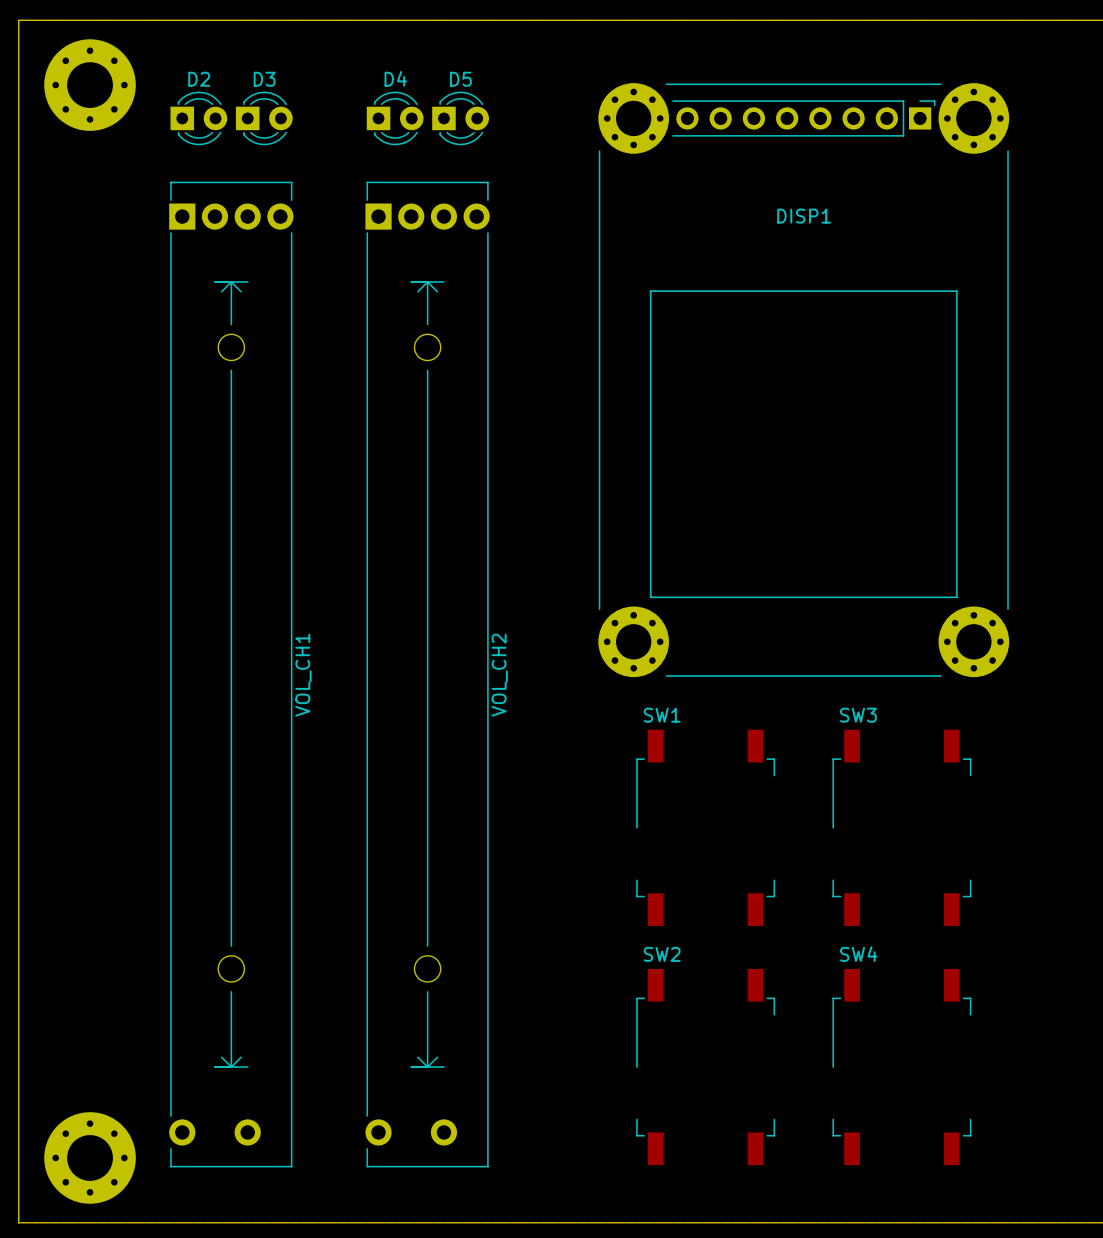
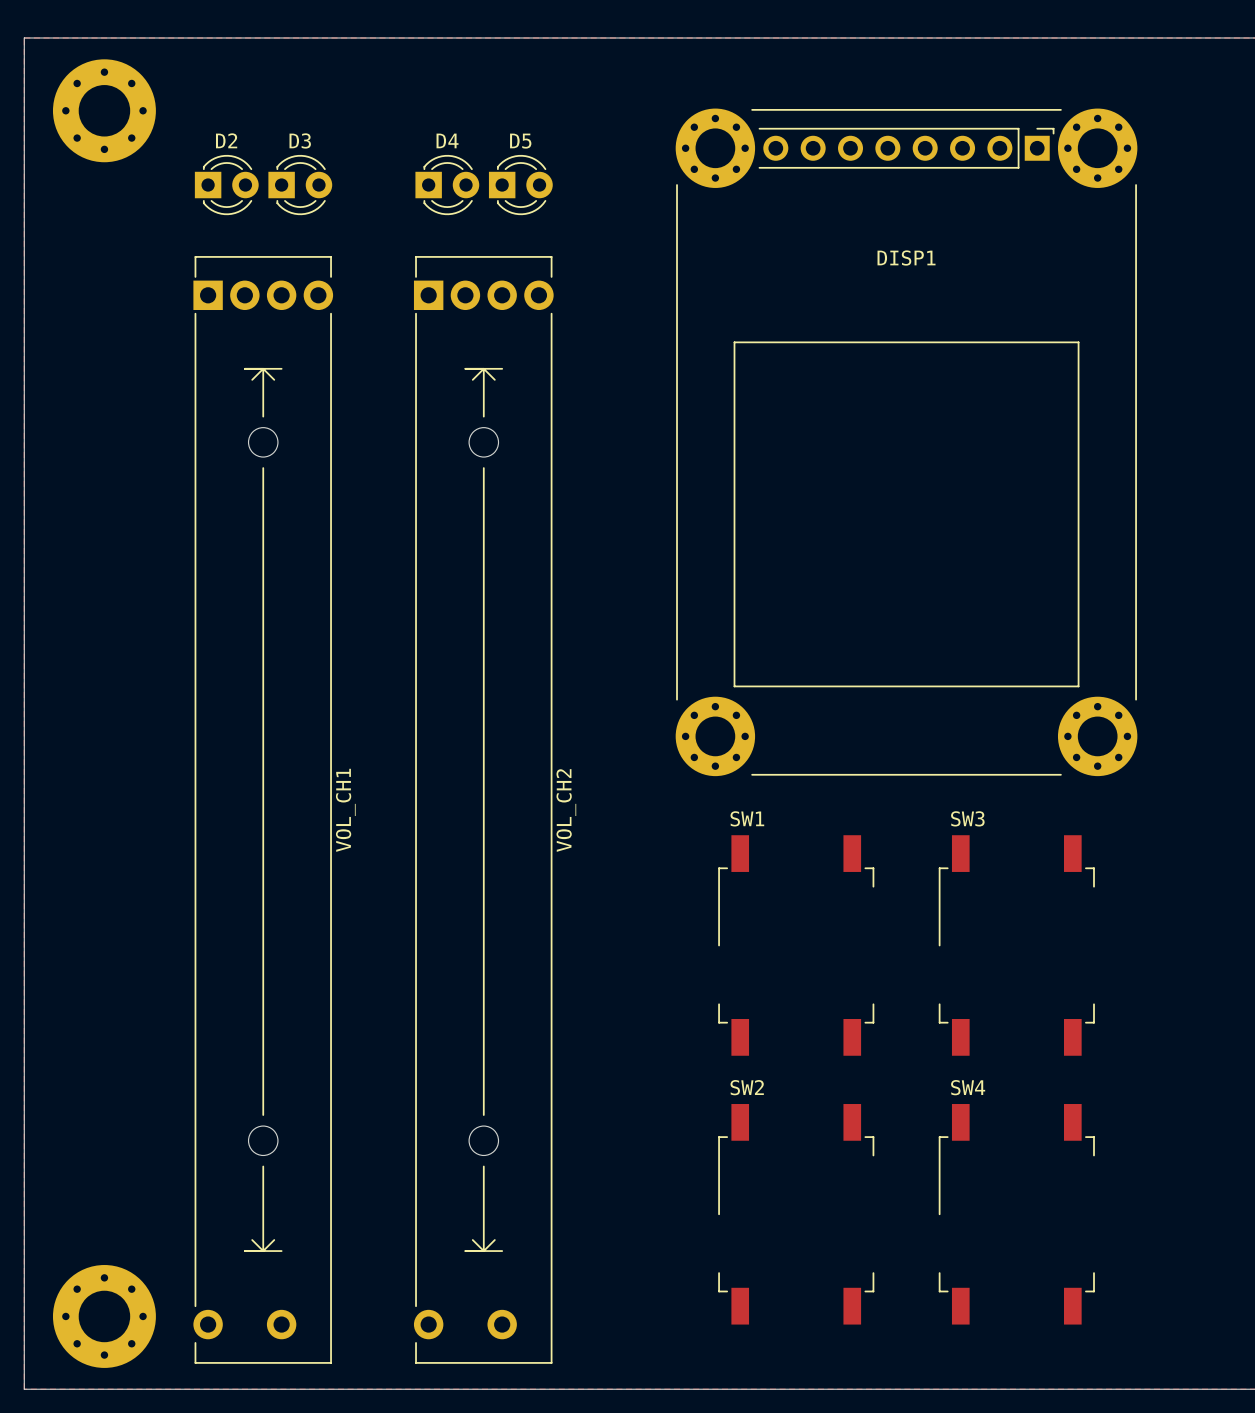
D2 position: (198, 118) -> (226, 185)
D3 position: (264, 118) -> (300, 185)
D4 position: (395, 118) -> (447, 185)
D5 position: (460, 118) -> (520, 185)
VOL_CH1 position: (231, 674) -> (263, 809)
VOL_CH2 position: (427, 674) -> (483, 809)

